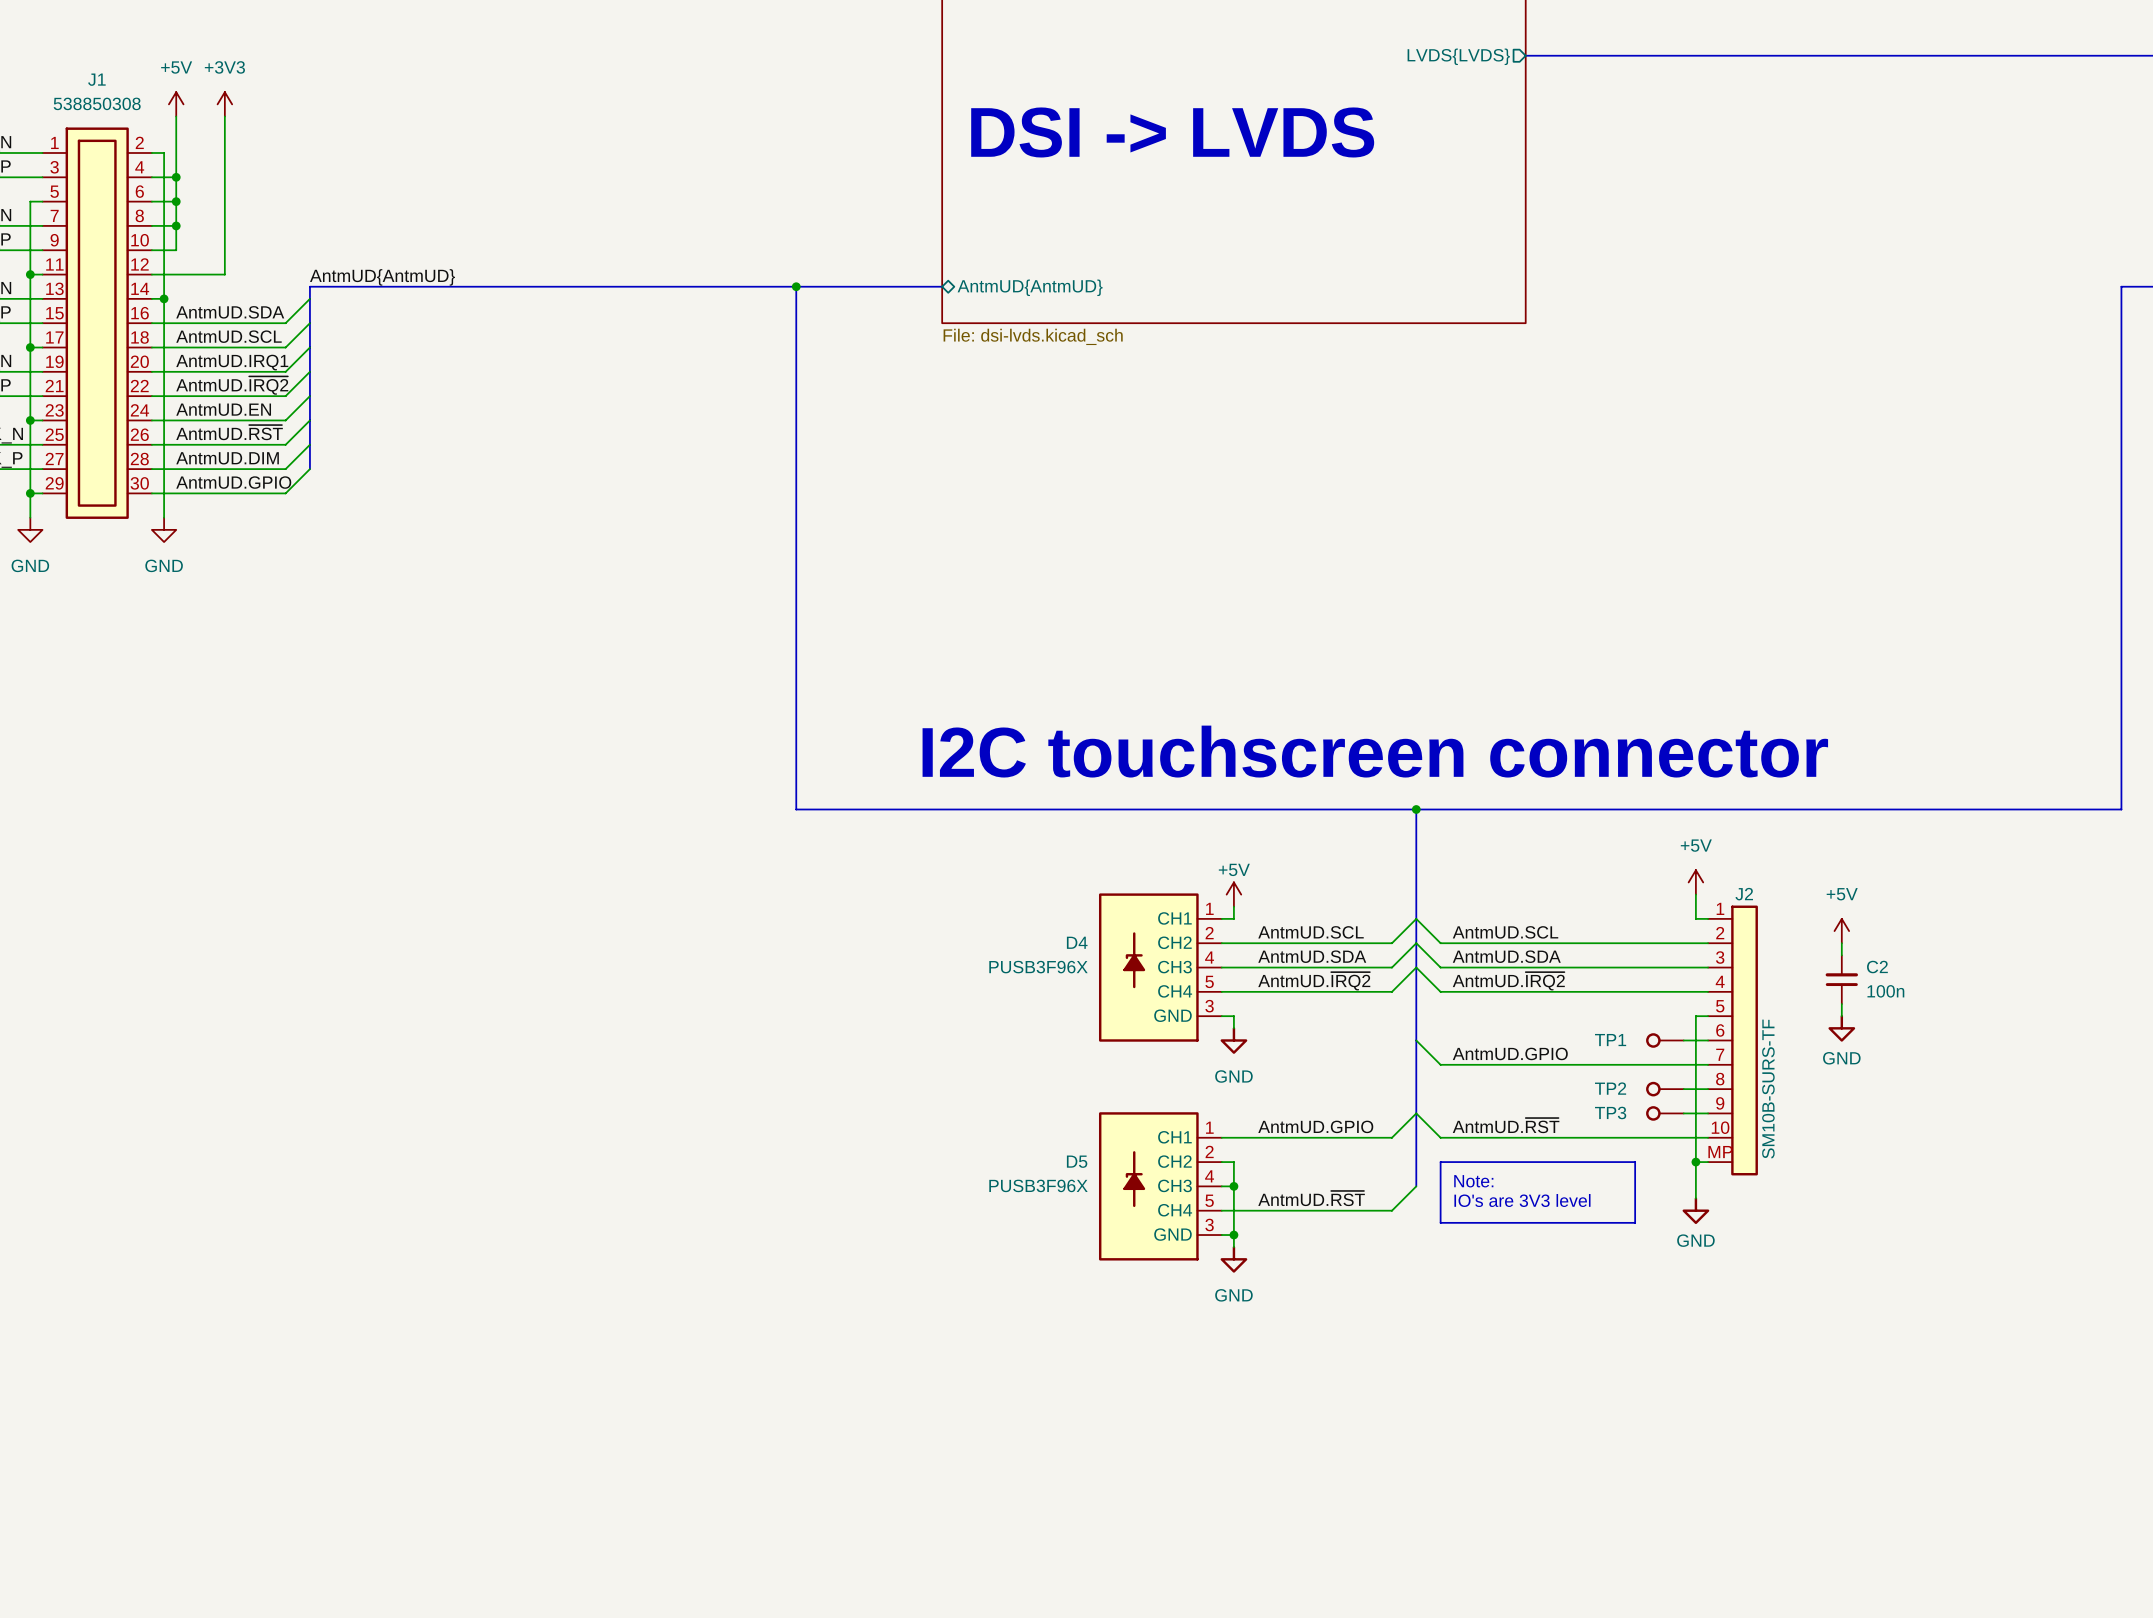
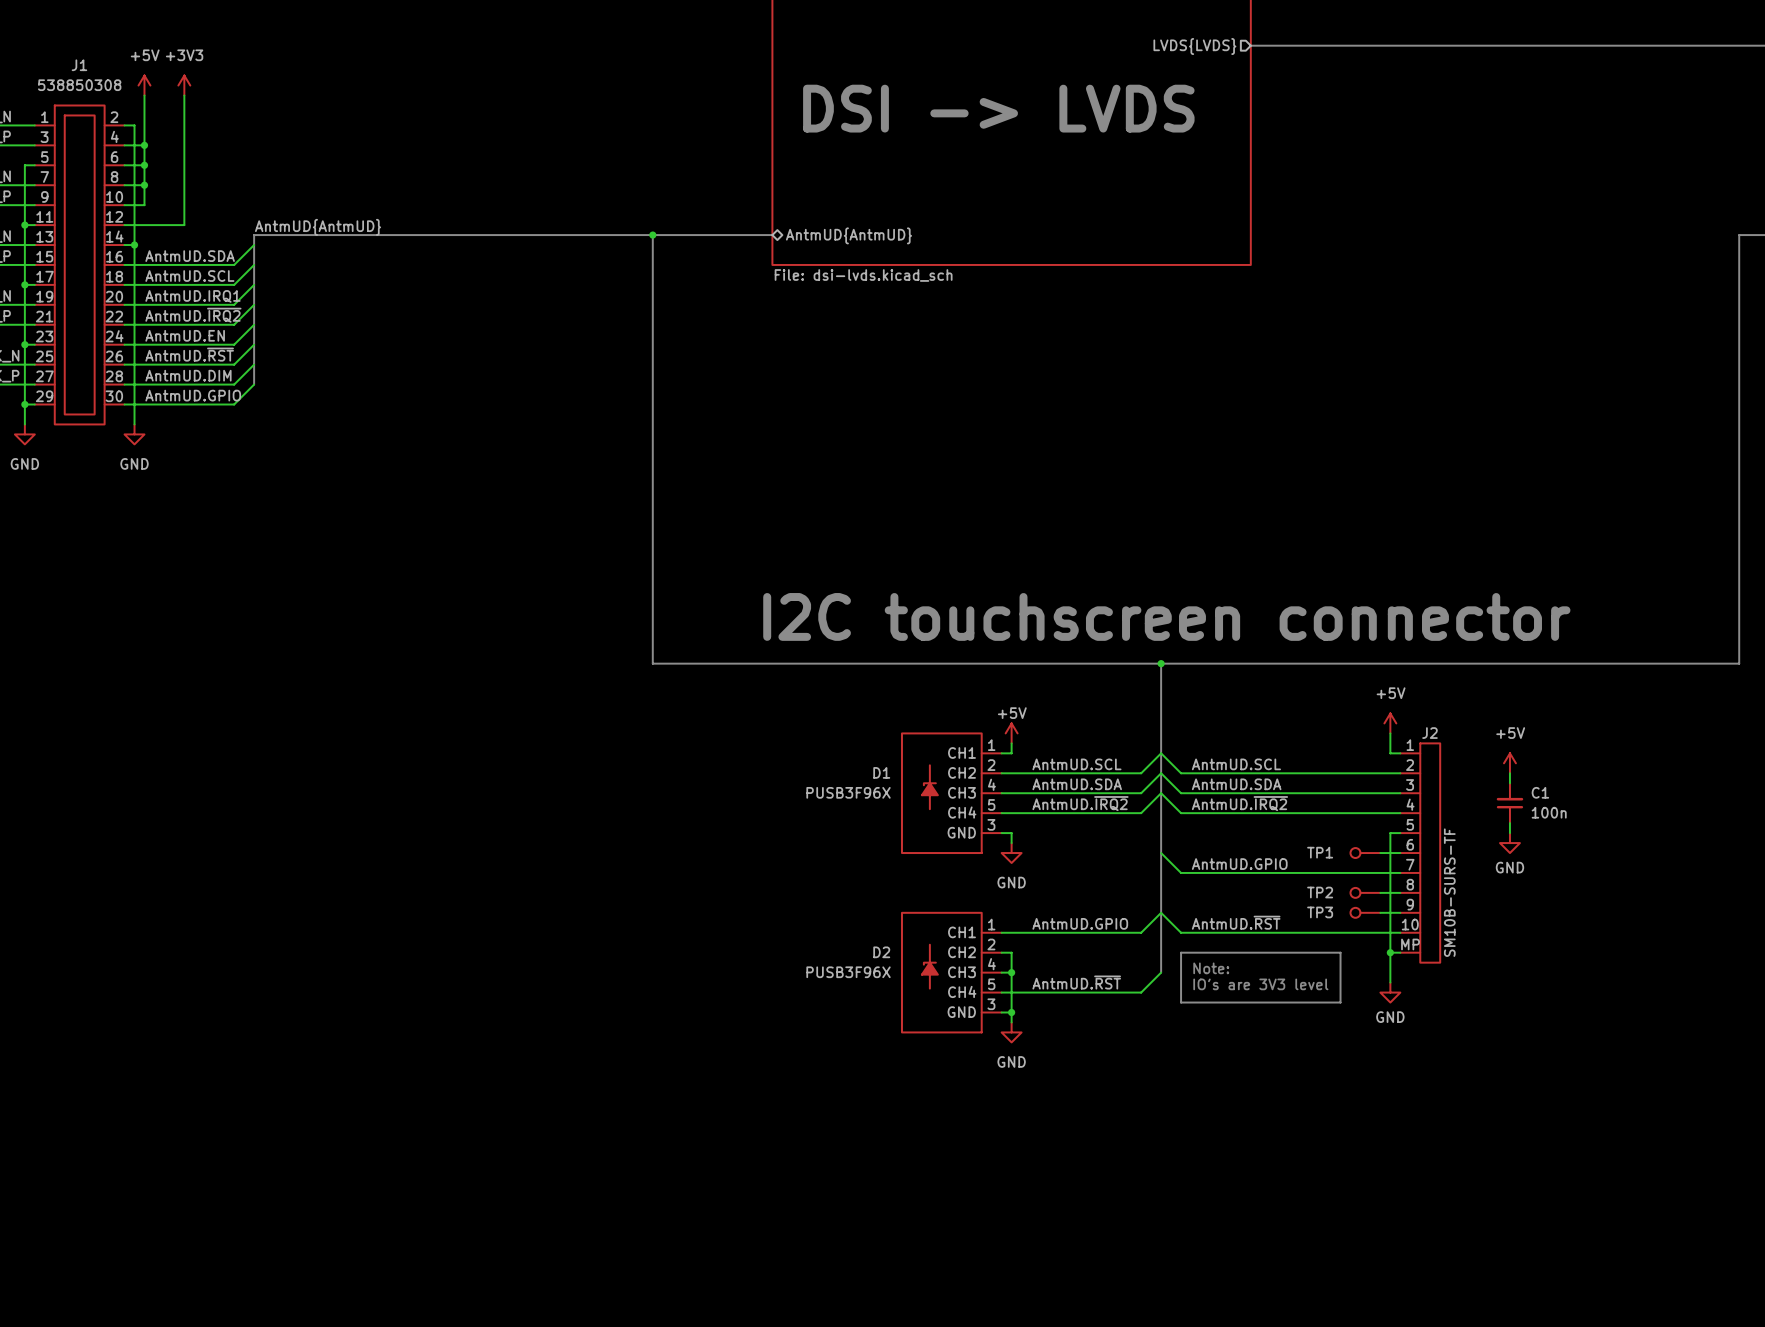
D4 name: D4 (1077, 942) -> D1 (881, 772)
C2 name: C2 (1877, 967) -> C1 (1540, 792)
D5 name: D5 (1077, 1161) -> D2 (881, 952)

